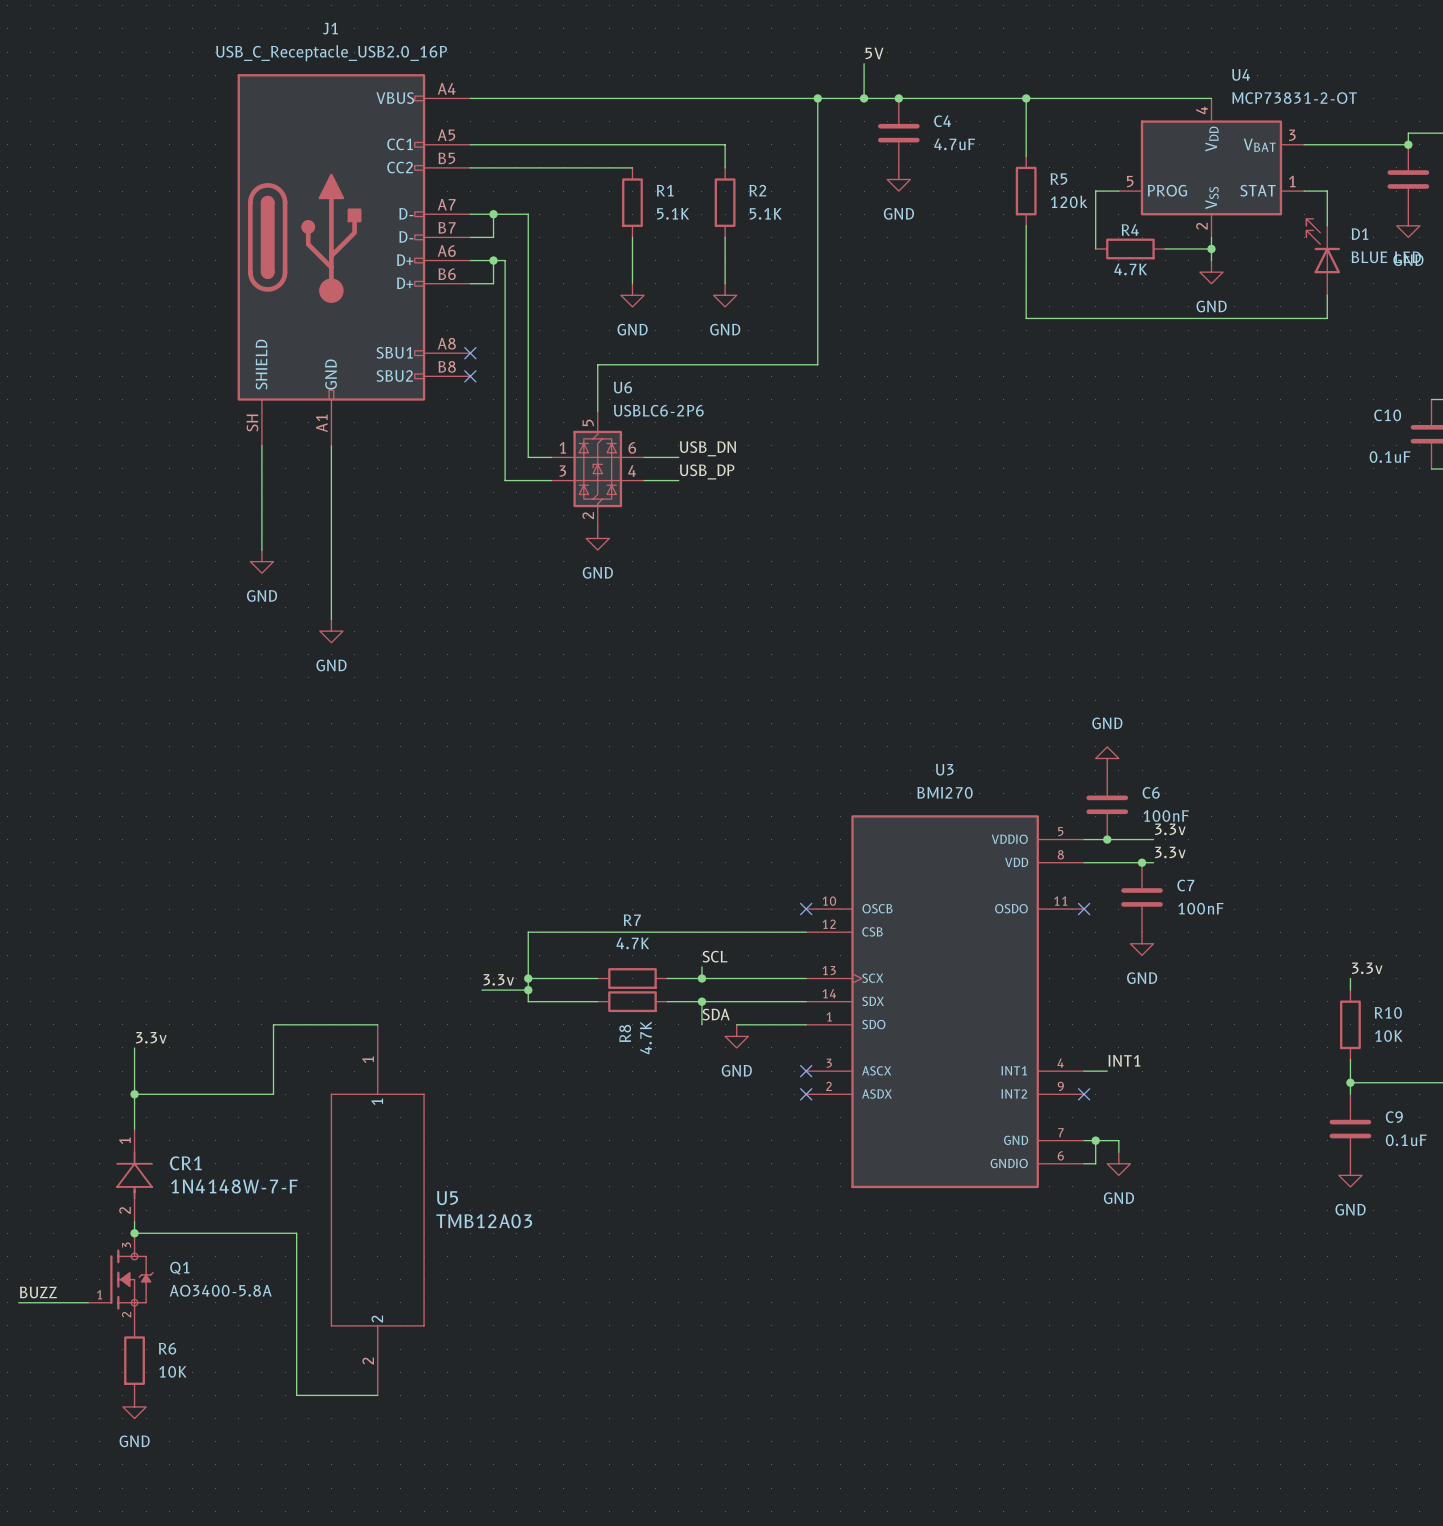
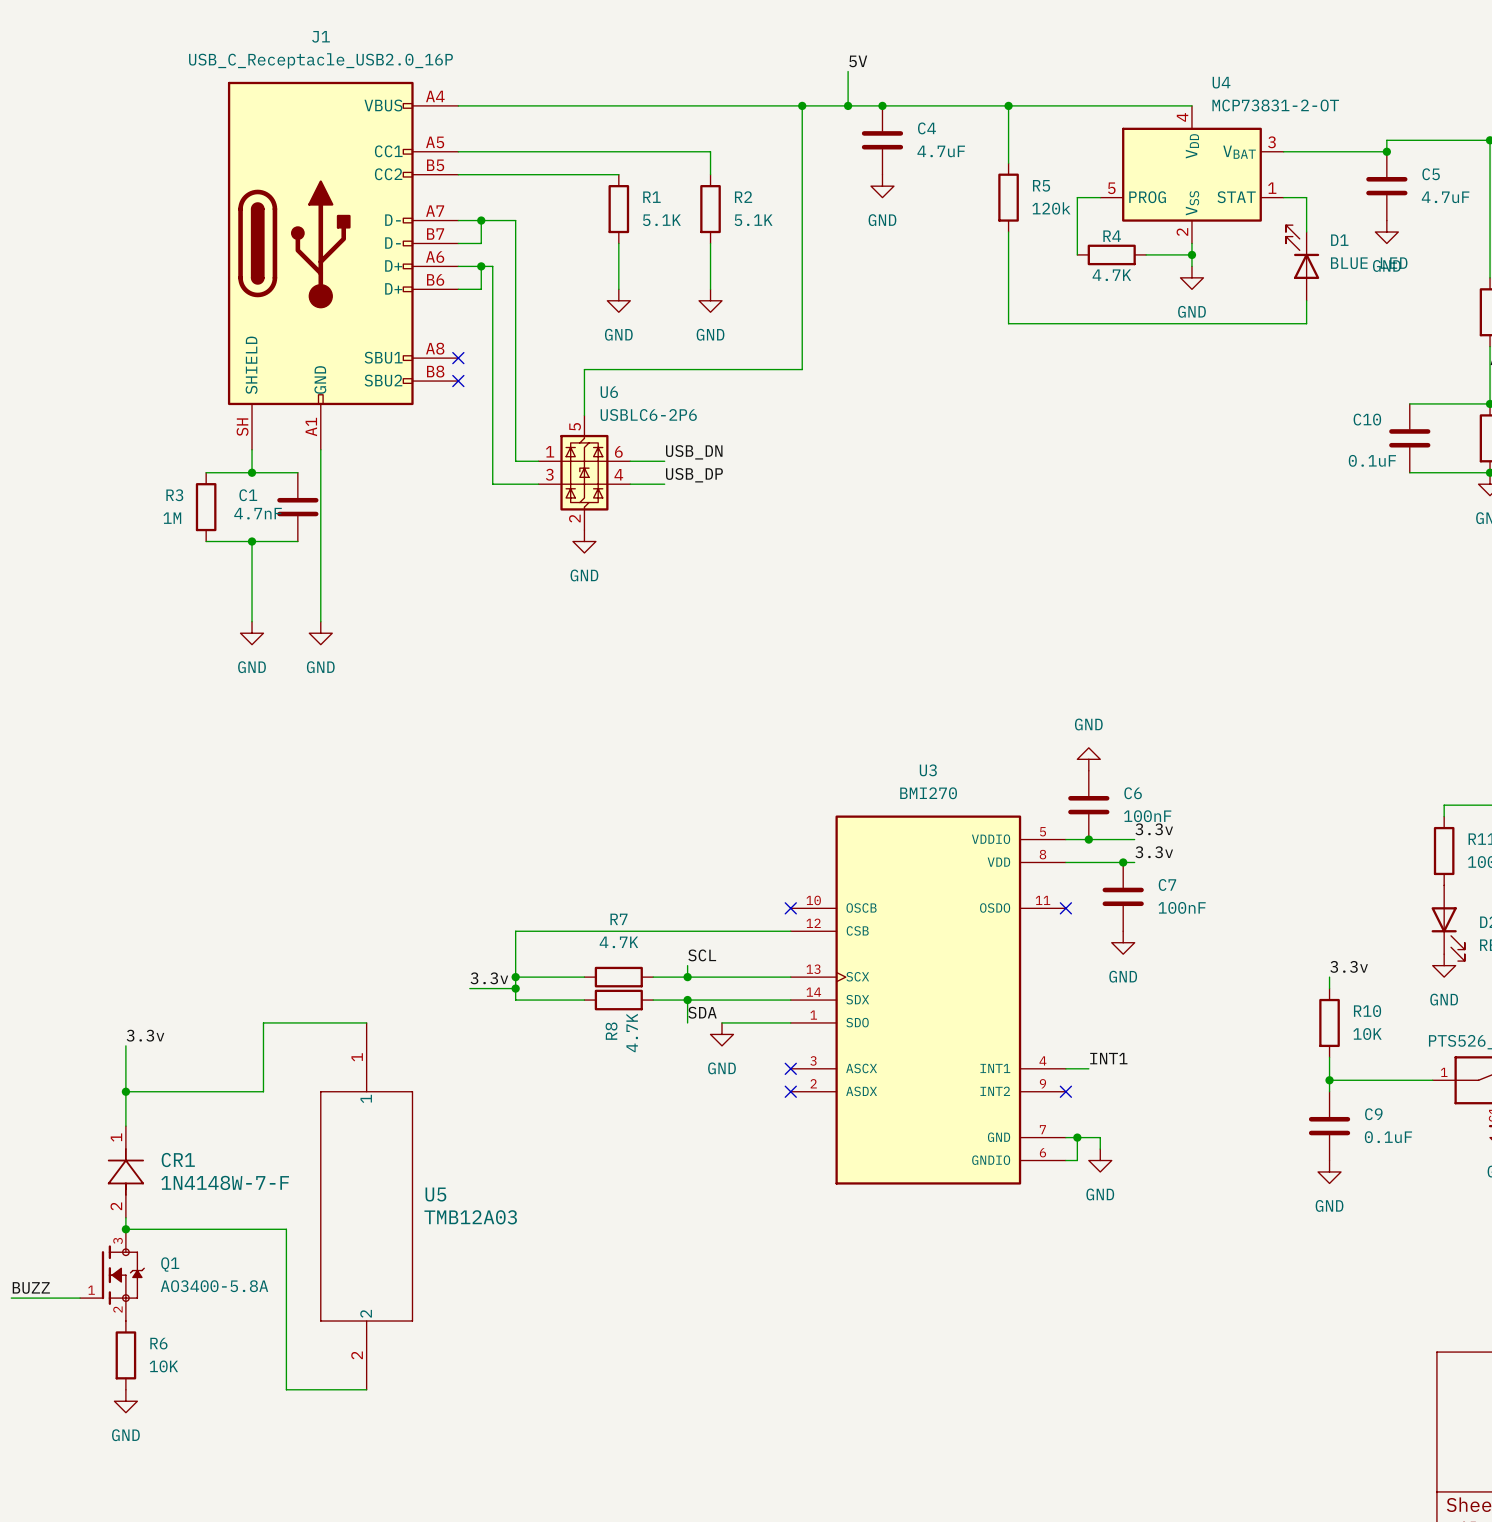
wire: none -> (206, 472) (297, 472)
wire: (261, 468) (261, 538) -> (252, 552) (252, 621)
junction: none -> (252, 472)
R3: none -> 1M (206, 507)
C1: none -> 4.7nF (297, 507)
wire: none -> (206, 541) (297, 541)
junction: none -> (252, 541)
power symbol position: GND (261, 561) -> GND (252, 633)

